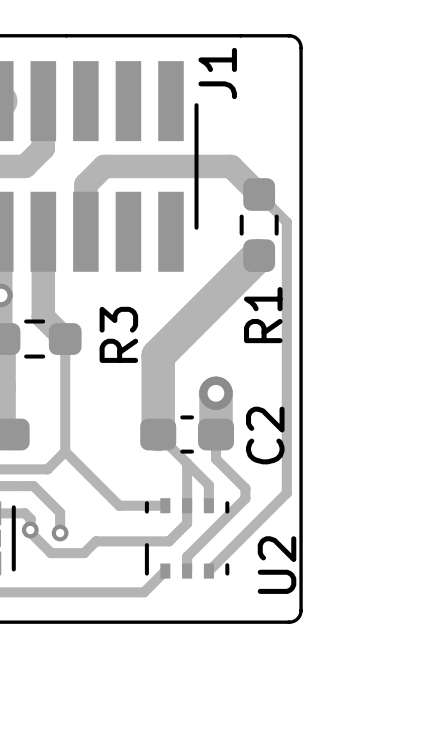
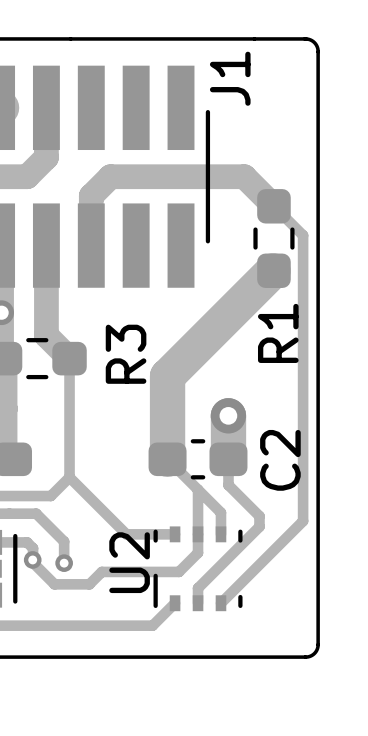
U2 name position: U2 (277, 565) -> U2 (129, 562)

